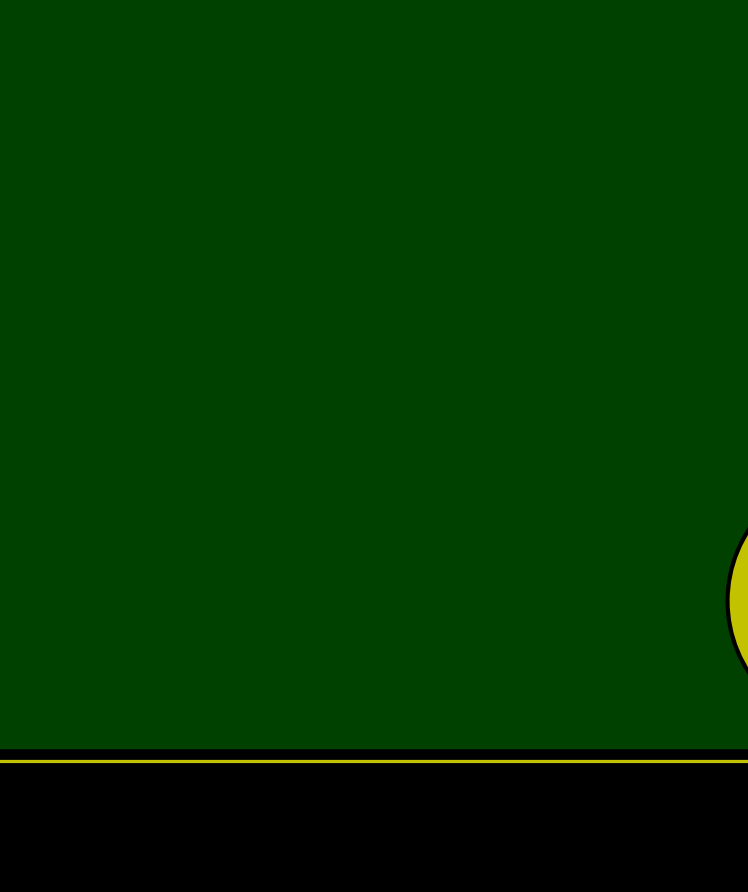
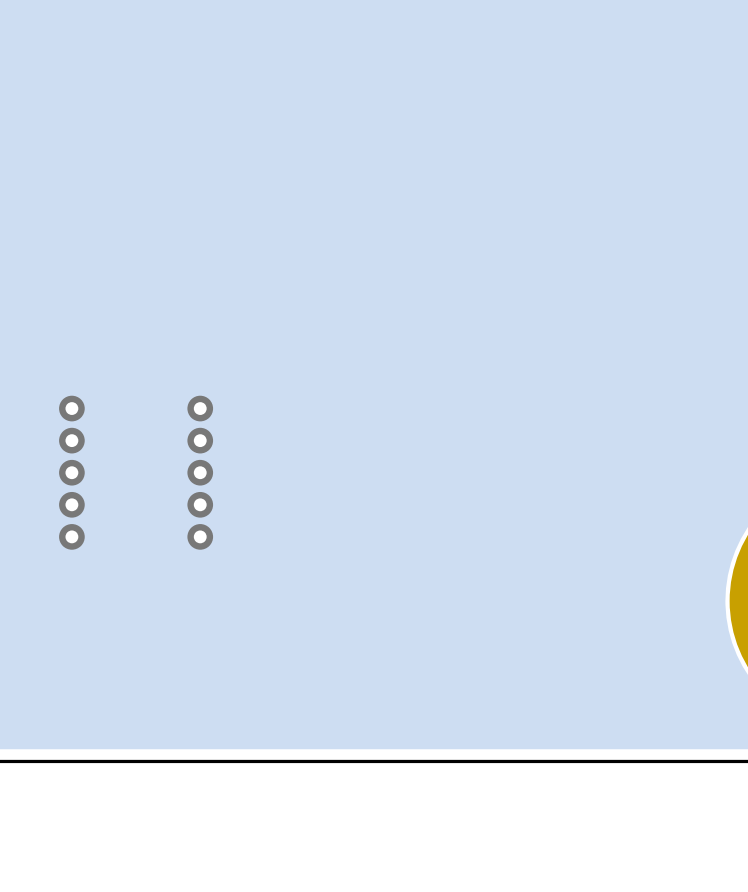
via: none -> (71, 408)
via: none -> (200, 408)
via: none -> (71, 440)
via: none -> (200, 440)
via: none -> (71, 472)
via: none -> (200, 472)
via: none -> (71, 504)
via: none -> (200, 504)
via: none -> (71, 536)
via: none -> (200, 536)

